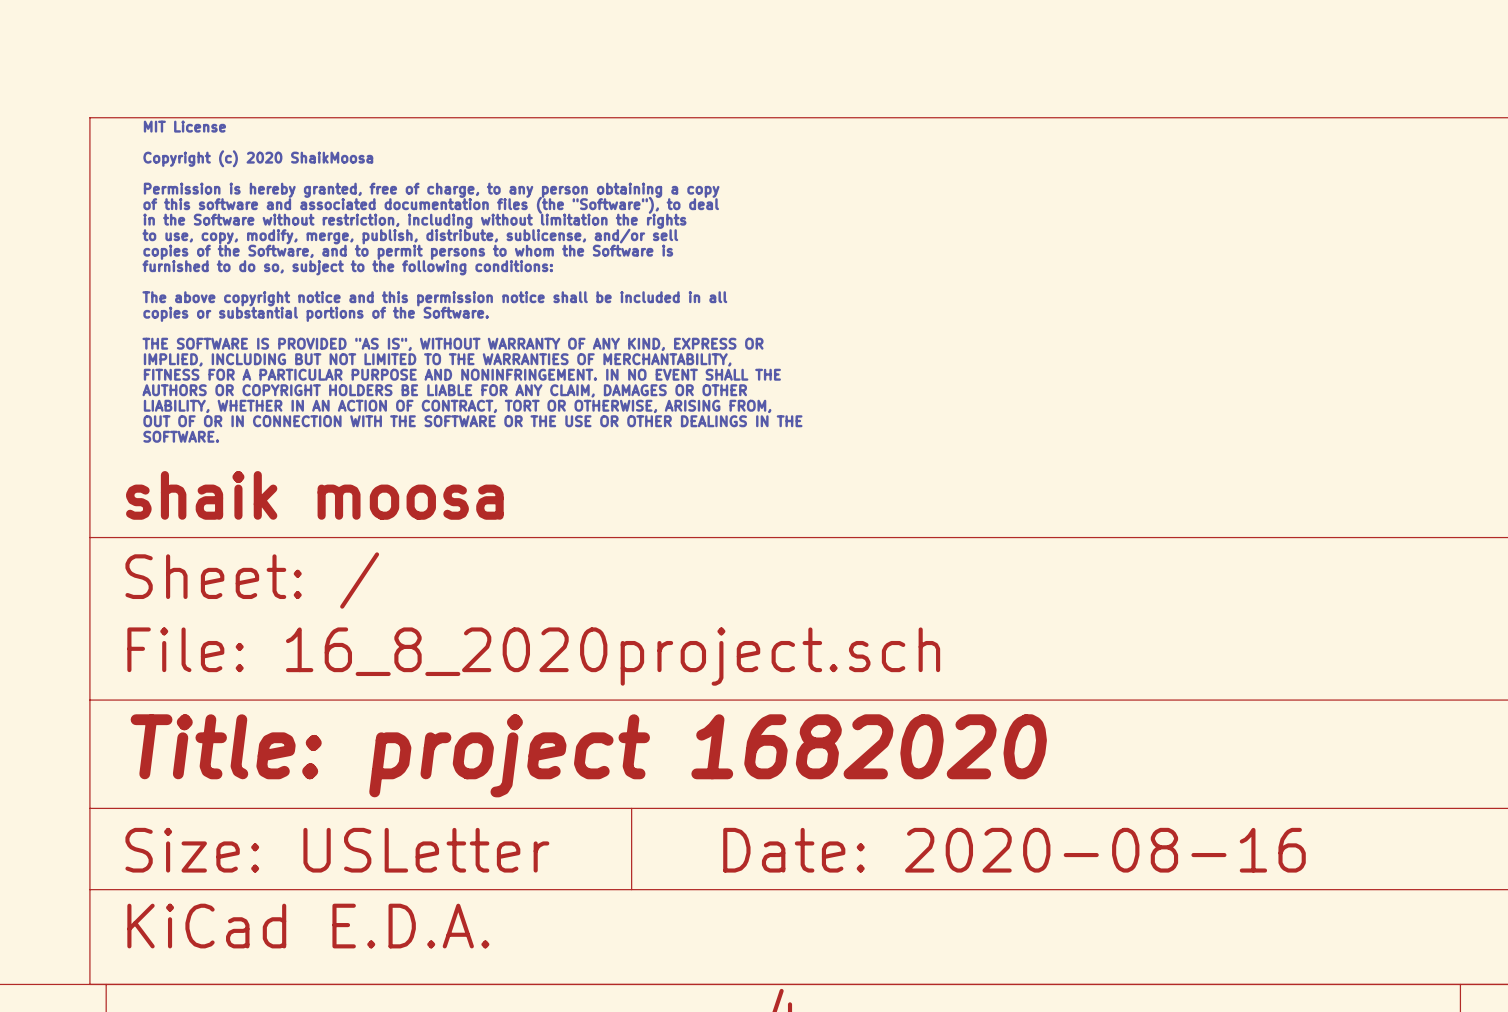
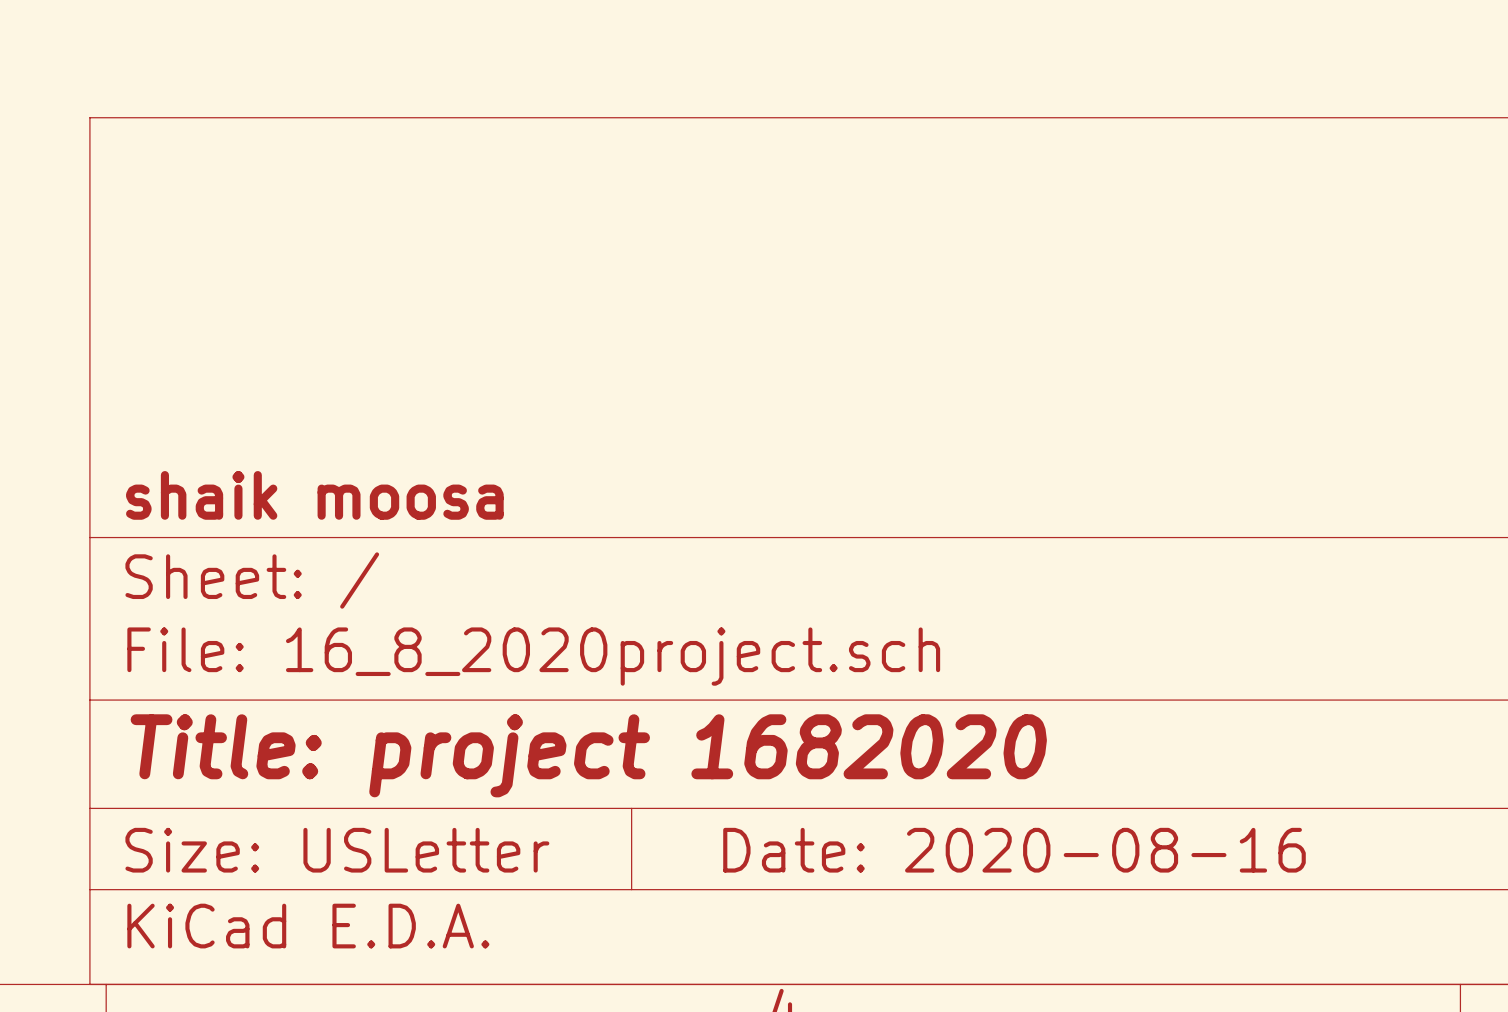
text: MIT License (184, 126) -> none
text: Copyright (c) 2020 ShaikMoosa (258, 158) -> none
text: Permission is hereby granted, free of charge, to any person obtaining a copy (431, 190) -> none
text: of this software and associated documentation files (the "Software"), to deal (431, 205) -> none
text: in the Software without restriction, including without limitation the rights (414, 221) -> none
text: to use, copy, modify, merge, publish, distribute, sublicense, and/or sell (410, 236) -> none
text: copies of the Software, and to permit persons to whom the Software is (408, 252) -> none
text: furnished to do so, subject to the following conditions: (347, 267) -> none
text: The above copyright notice and this permission notice shall be included in all (434, 298) -> none
text: copies or substantial portions of the Software. (316, 314) -> none
text: THE SOFTWARE IS PROVIDED "AS IS", WITHOUT WARRANTY OF ANY KIND, EXPRESS OR (452, 344) -> none
text: IMPLIED, INCLUDING BUT NOT LIMITED TO THE WARRANTIES OF MERCHANTABILITY, (437, 359) -> none
text: FITNESS FOR A PARTICULAR PURPOSE AND NONINFRINGEMENT. IN NO EVENT SHALL THE (462, 374) -> none
text: AUTHORS OR COPYRIGHT HOLDERS BE LIABLE FOR ANY CLAIM, DAMAGES OR OTHER (444, 390) -> none
text: LIABILITY, WHETHER IN AN ACTION OF CONTRACT, TORT OR OTHERWISE, ARISING FROM, (457, 406) -> none
text: OUT OF OR IN CONNECTION WITH THE SOFTWARE OR THE USE OR OTHER DEALINGS IN THE (472, 421) -> none
text: SOFTWARE. (181, 436) -> none

